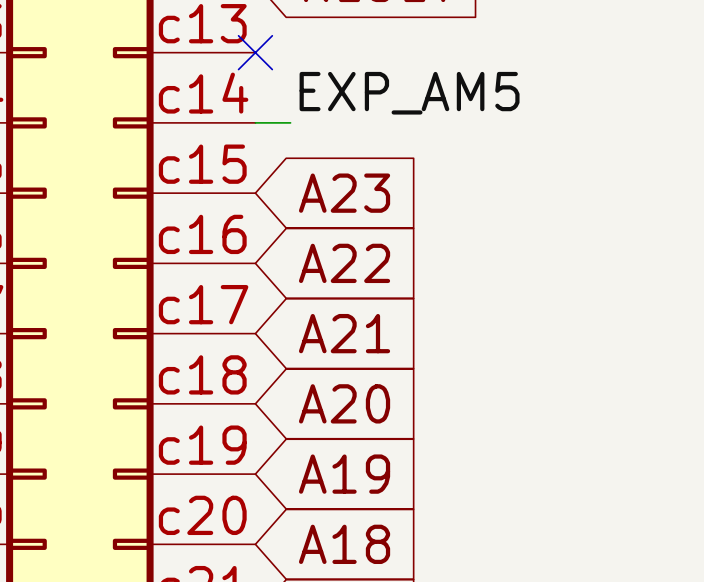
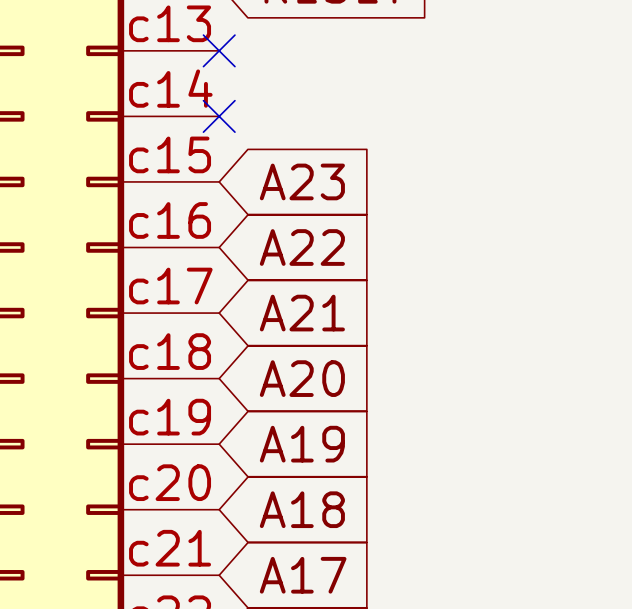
label: EXP_AM5 (409, 93) -> none
wire: (255, 122) (290, 122) -> none
no-connect mark: none -> (219, 116)

